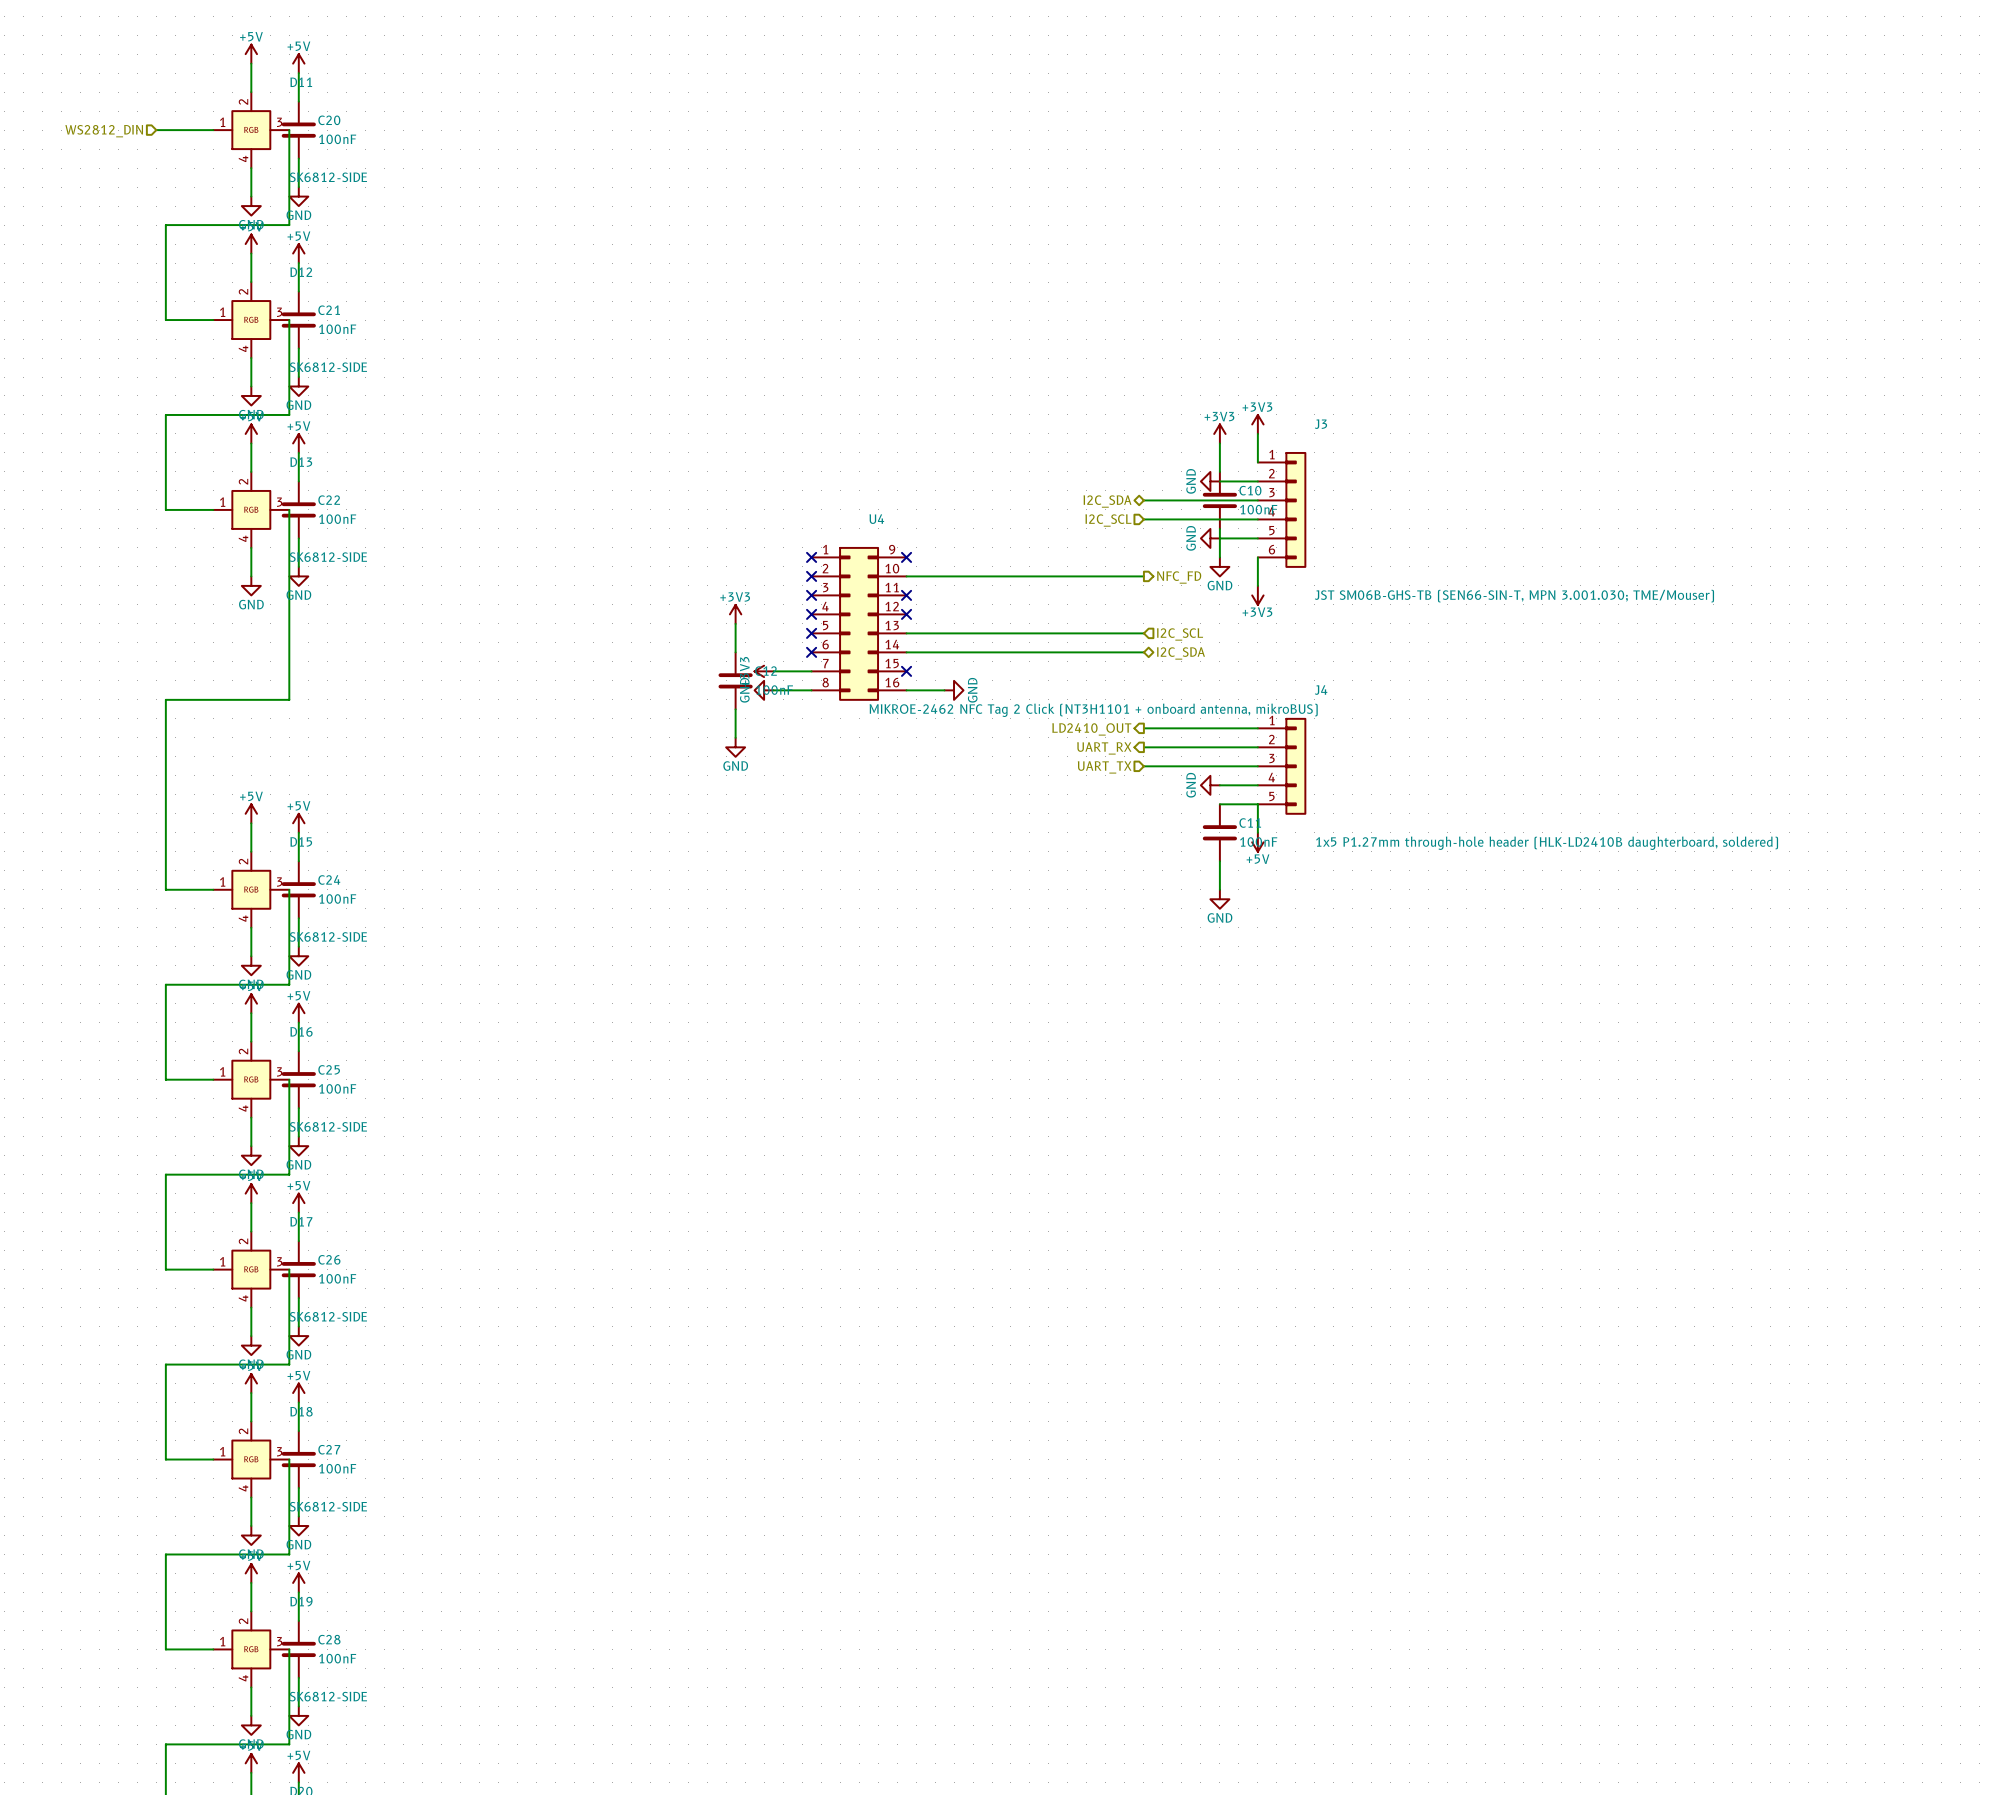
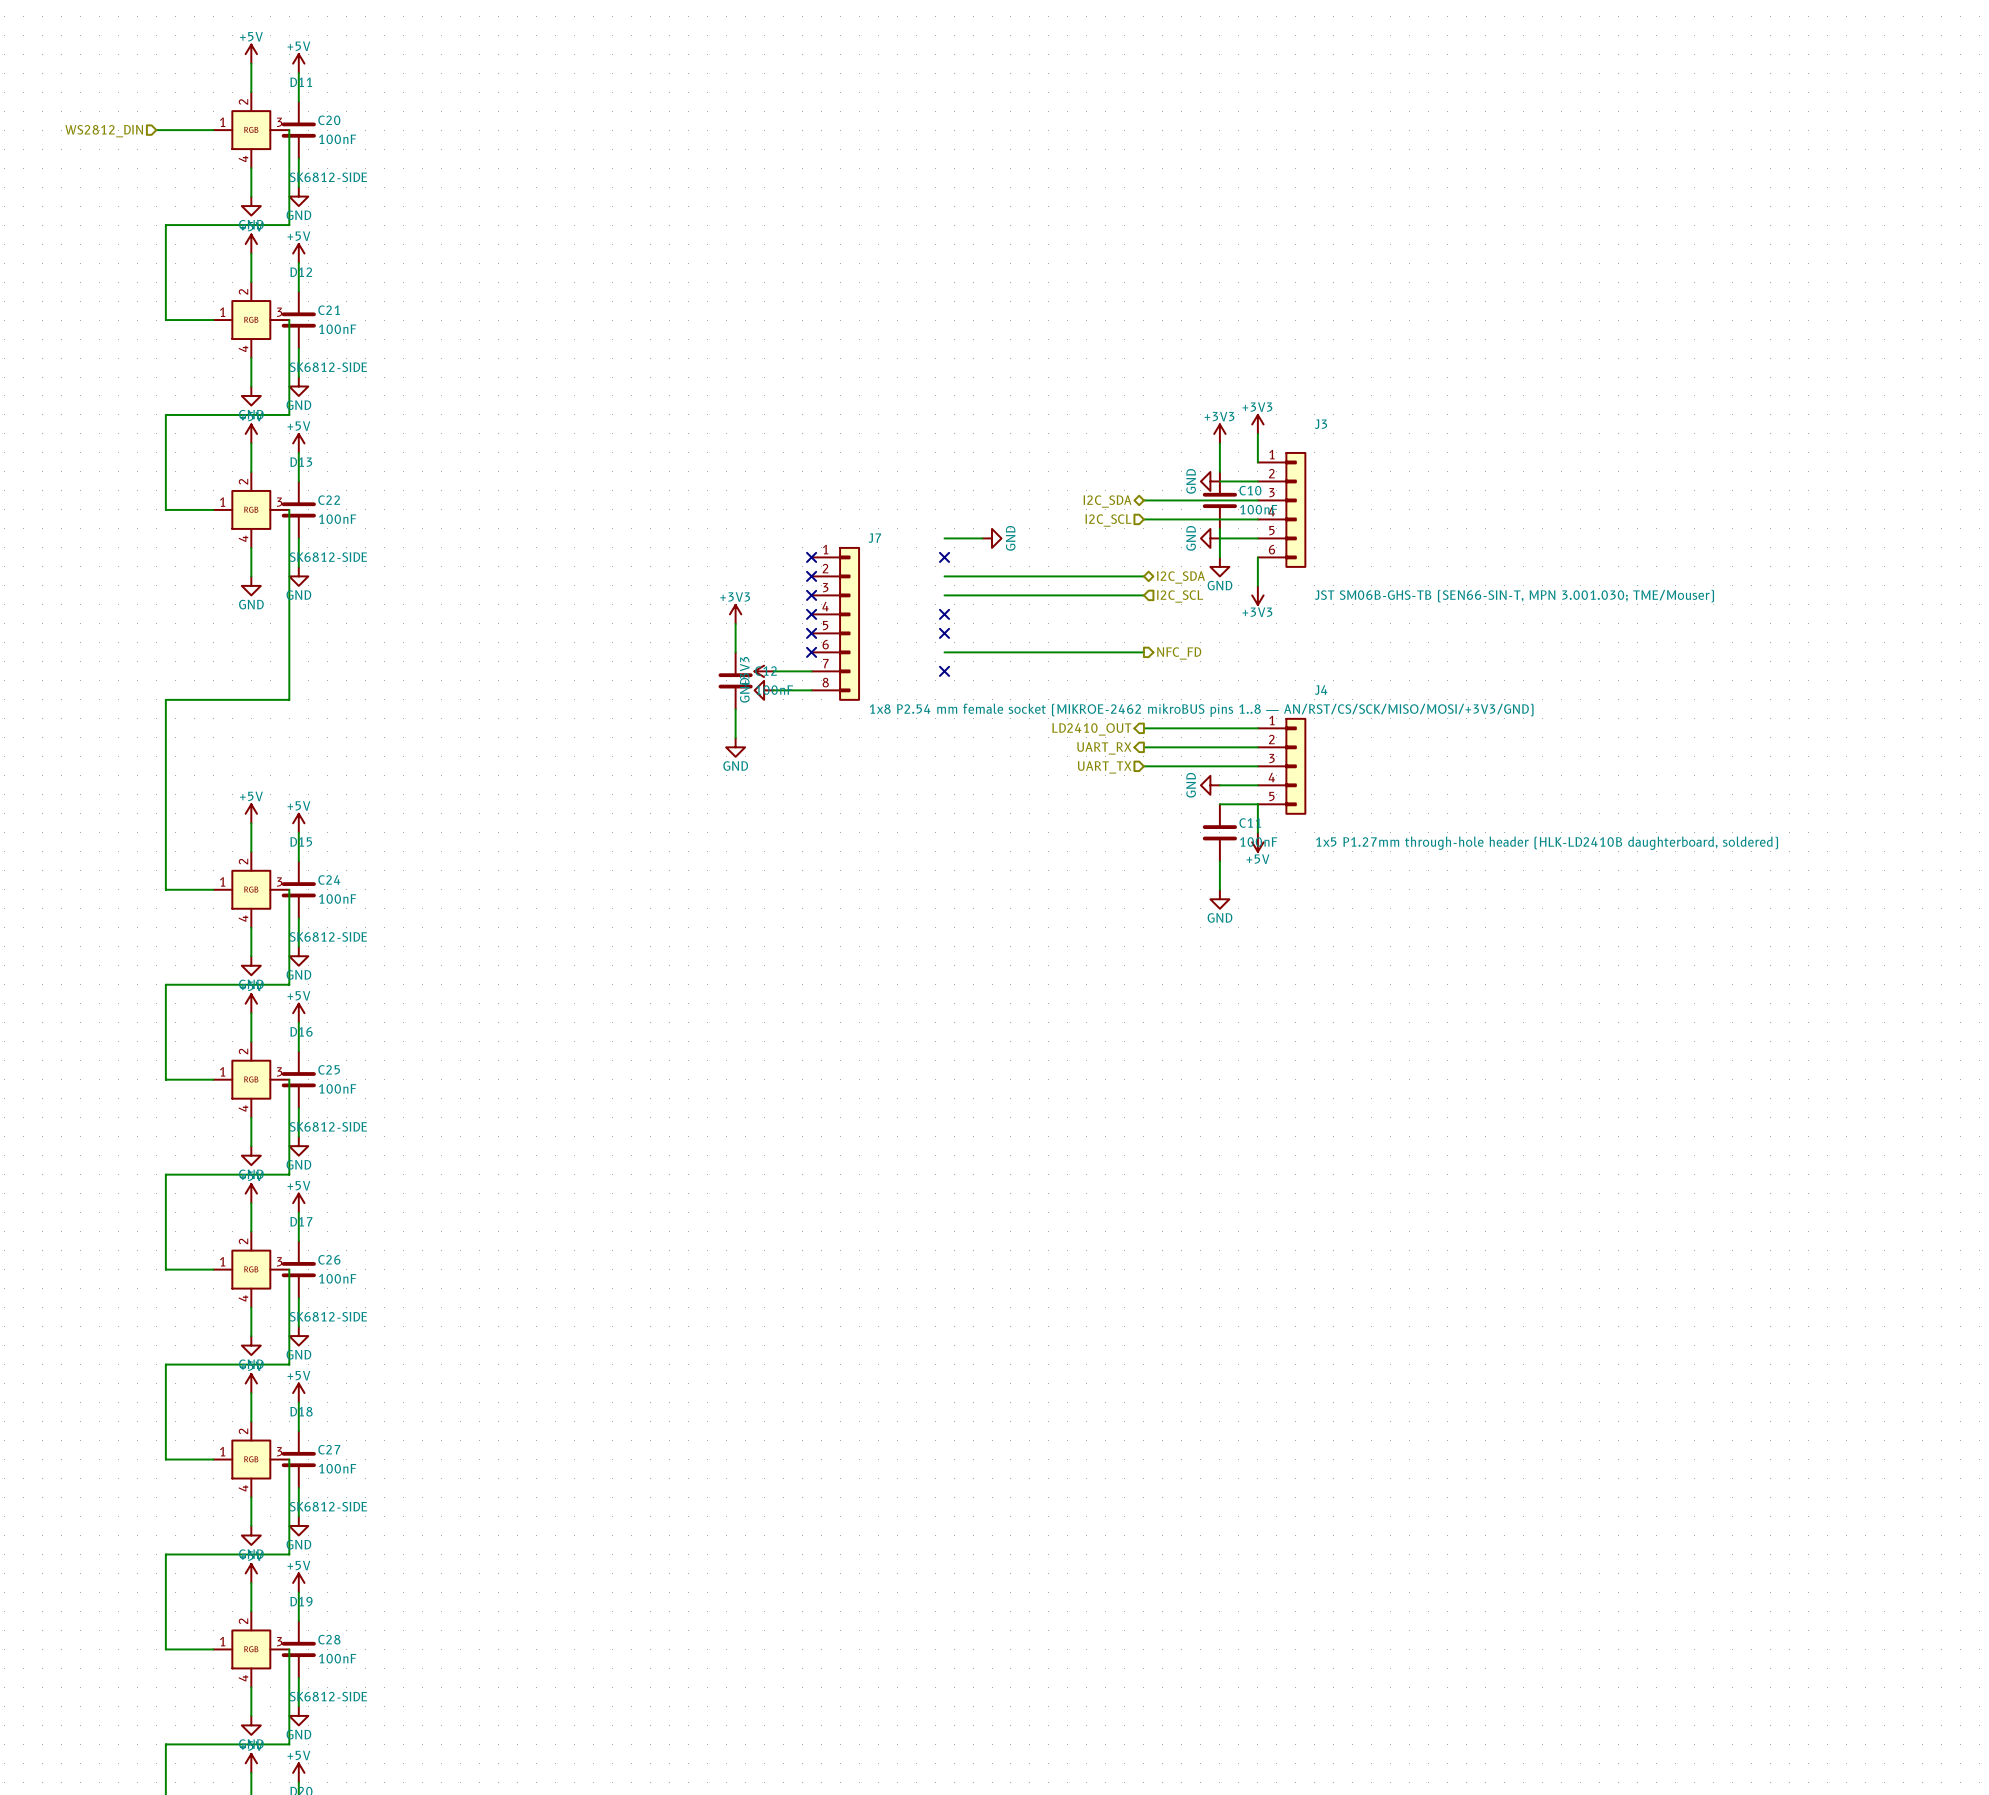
no-connect mark: (906, 557) -> none
no-connect mark: none -> (944, 557)
wire: (906, 576) (944, 576) -> (944, 538) (982, 538)
hierarchical label shape: output (1179, 577) -> bidirectional (1180, 577)
hierarchical label: NFC_FD (1179, 577) -> I2C_SDA (1180, 577)
no-connect mark: (906, 595) -> none
wire: none -> (944, 595) (1143, 595)
no-connect mark: (906, 614) -> none
no-connect mark: none -> (944, 614)
J7: none -> 1x8 P2.54 mm female socket (MIKROE-2462 mikroBUS pins 1..8 — AN/RST/CS/SCK/MISO/MOSI/+3V3/GND) (835, 623)
U4: MIKROE-2462 NFC Tag 2 Click (NT3H1101 + onboard antenna, mikroBUS) (859, 623) -> none
wire: (906, 633) (1143, 633) -> none
no-connect mark: none -> (944, 633)
hierarchical label position: I2C_SCL (1180, 634) -> I2C_SCL (1180, 596)
wire: (906, 652) (944, 652) -> none
hierarchical label shape: bidirectional (1180, 653) -> output (1179, 653)
hierarchical label: I2C_SDA (1180, 653) -> NFC_FD (1179, 653)
no-connect mark: (906, 671) -> none
no-connect mark: none -> (944, 671)
wire: (906, 690) (944, 690) -> none
power symbol position: GND (954, 690) -> GND (992, 538)

